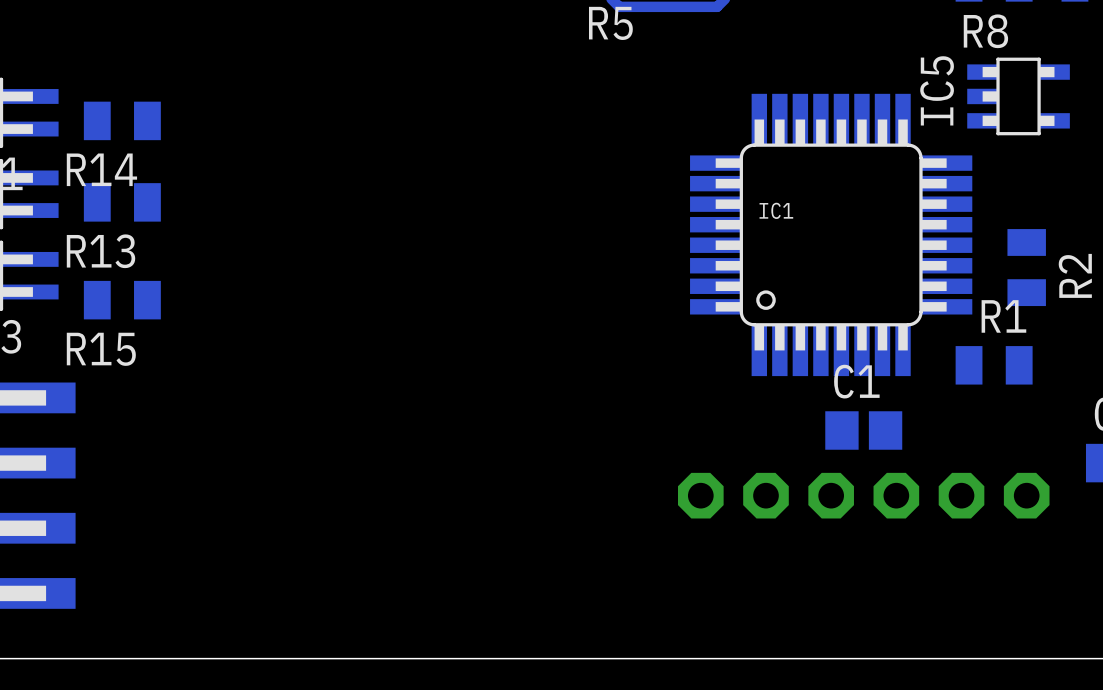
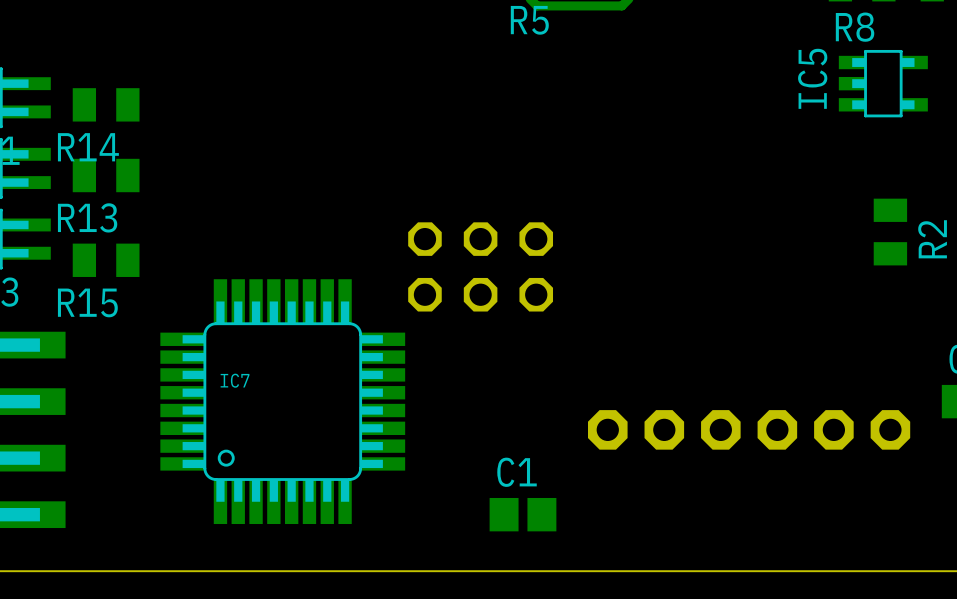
IC1: (831, 234) -> none
part: none -> (480, 266)
R1: (994, 365) -> none
C1 position: (863, 430) -> (522, 514)
IC7: none -> (282, 401)

